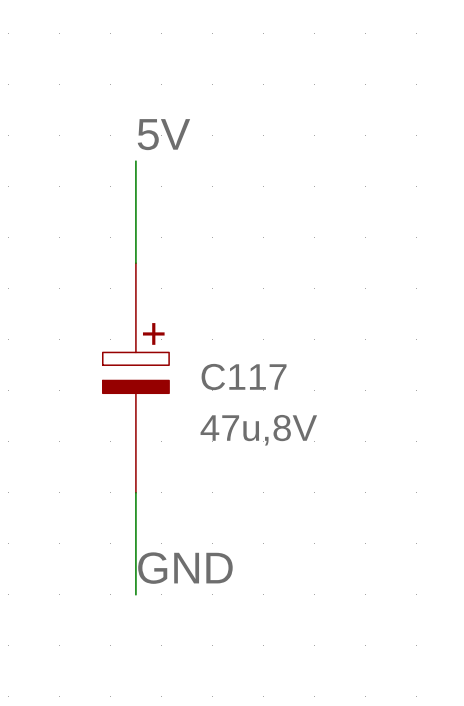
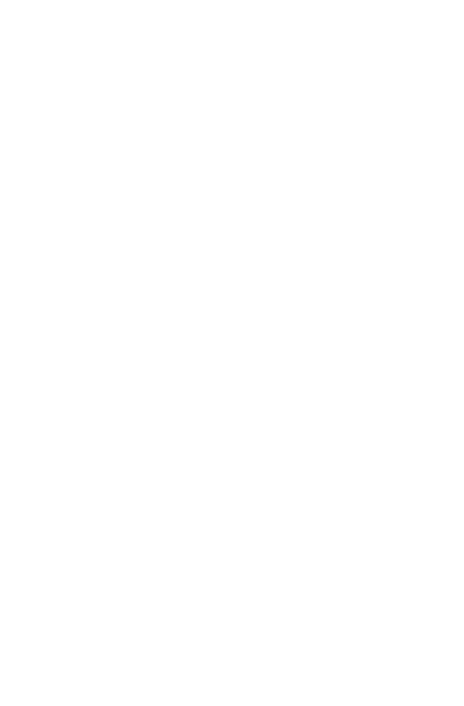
label: 5V (163, 134) -> none
wire: (135, 161) (135, 263) -> none
C117: 47u,8V (135, 377) -> none
wire: (135, 492) (135, 594) -> none
label: GND (185, 568) -> none

